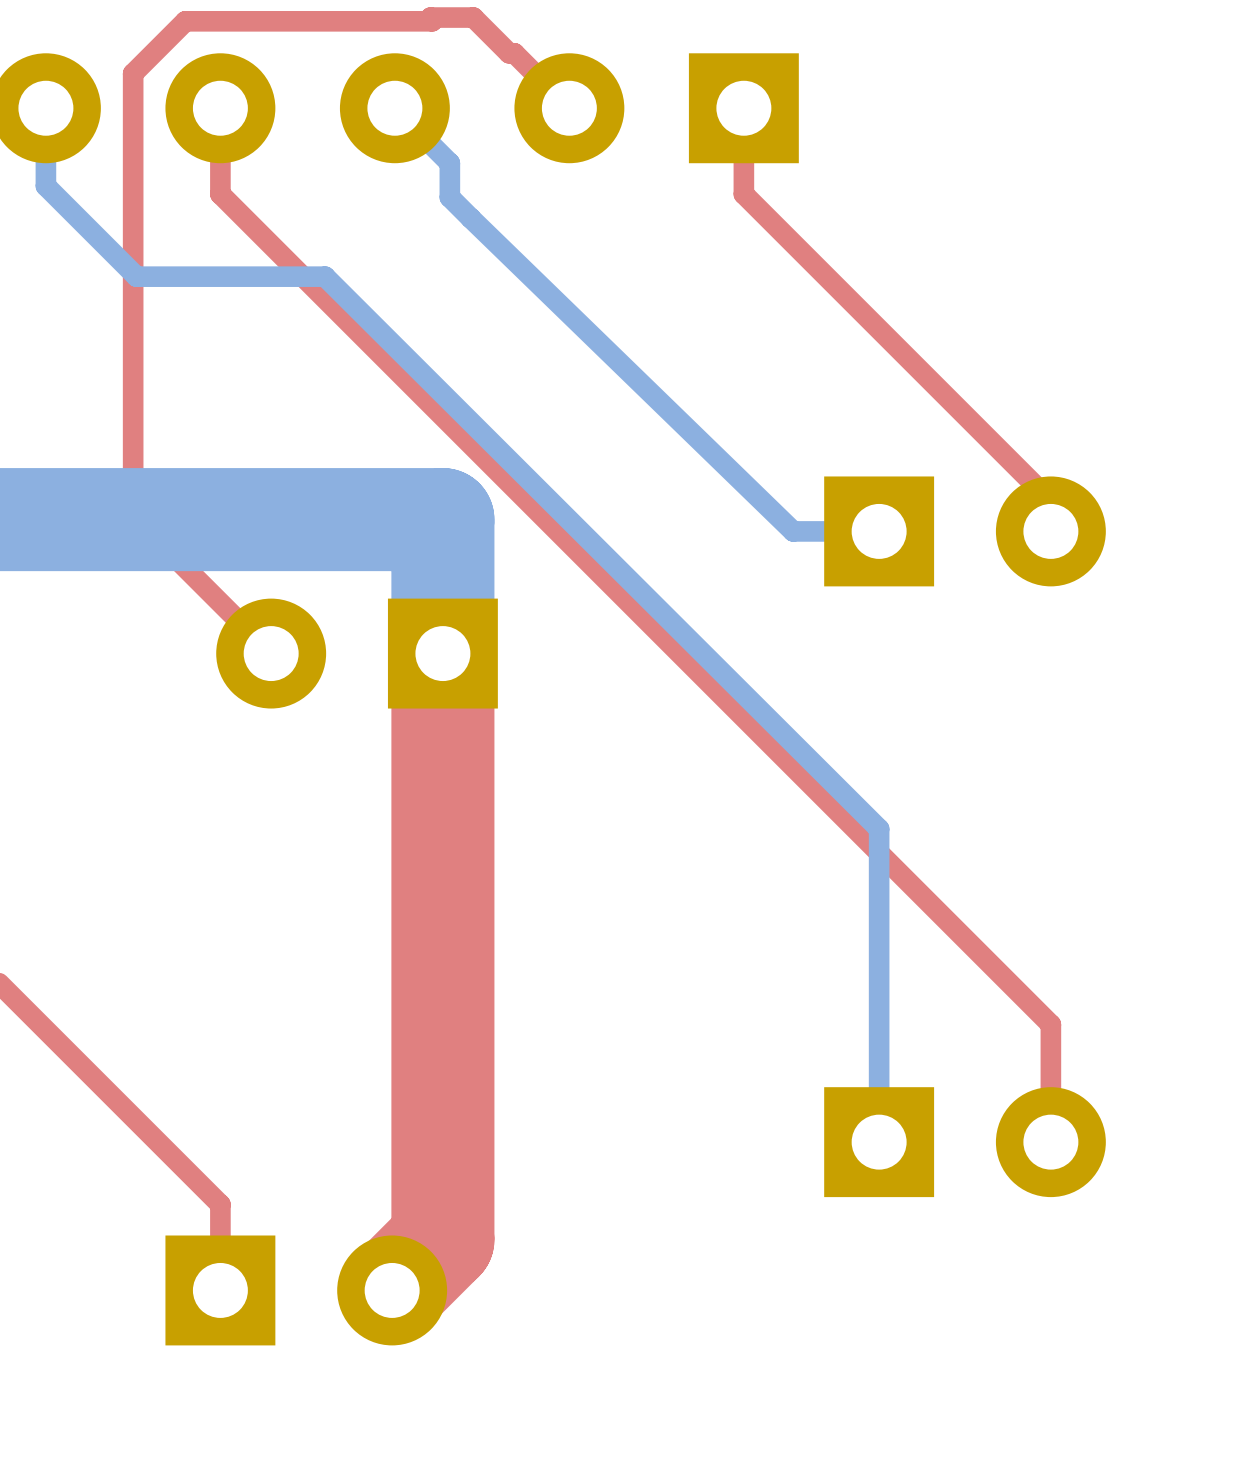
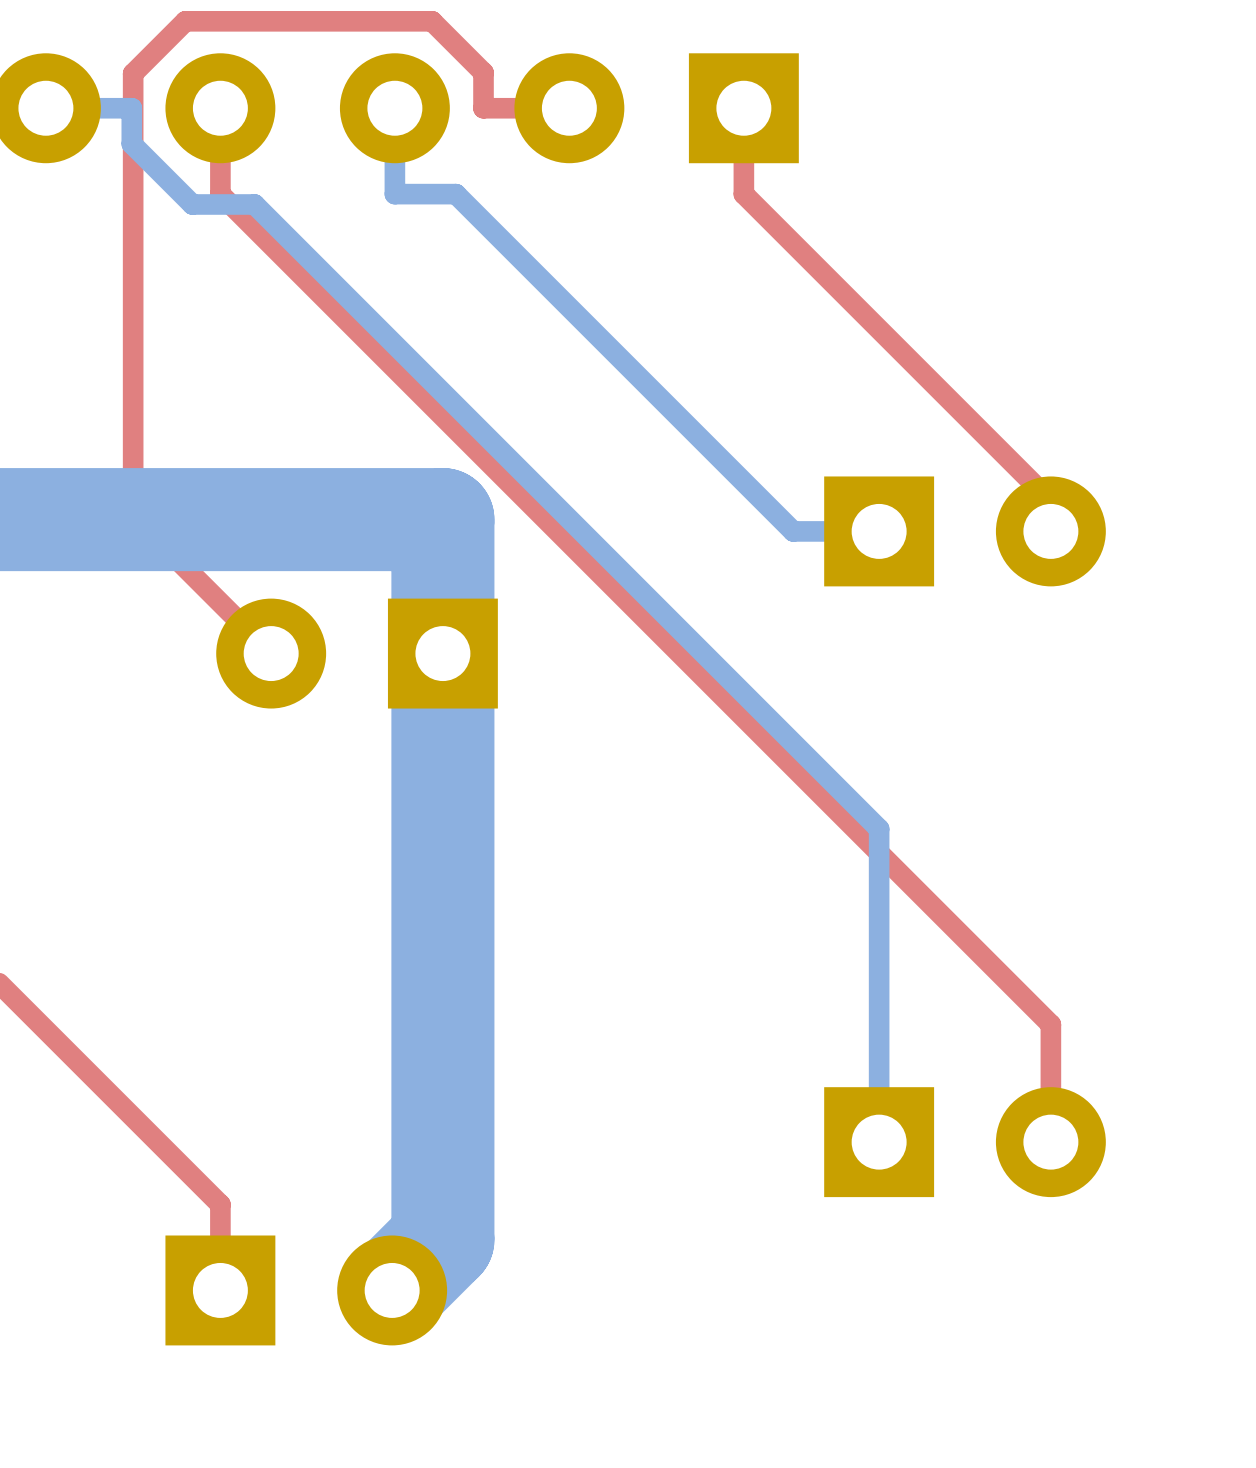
top track: (432, 21) (430, 17) (473, 17) (509, 53) (514, 53) (569, 108) -> (432, 21) (483, 72) (483, 108) (569, 108)
bottom track: (45, 108) (45, 185) (136, 276) (325, 276) (879, 829) -> (45, 108) (131, 108) (131, 143) (192, 204) (254, 204) (879, 829)
bottom track: (394, 108) (449, 163) (449, 197) (793, 531) -> (394, 108) (394, 194) (455, 194) (793, 531)
bottom track: none -> (442, 653) (442, 1239) (392, 1290)
top track: (442, 653) (442, 1239) (392, 1290) -> none

